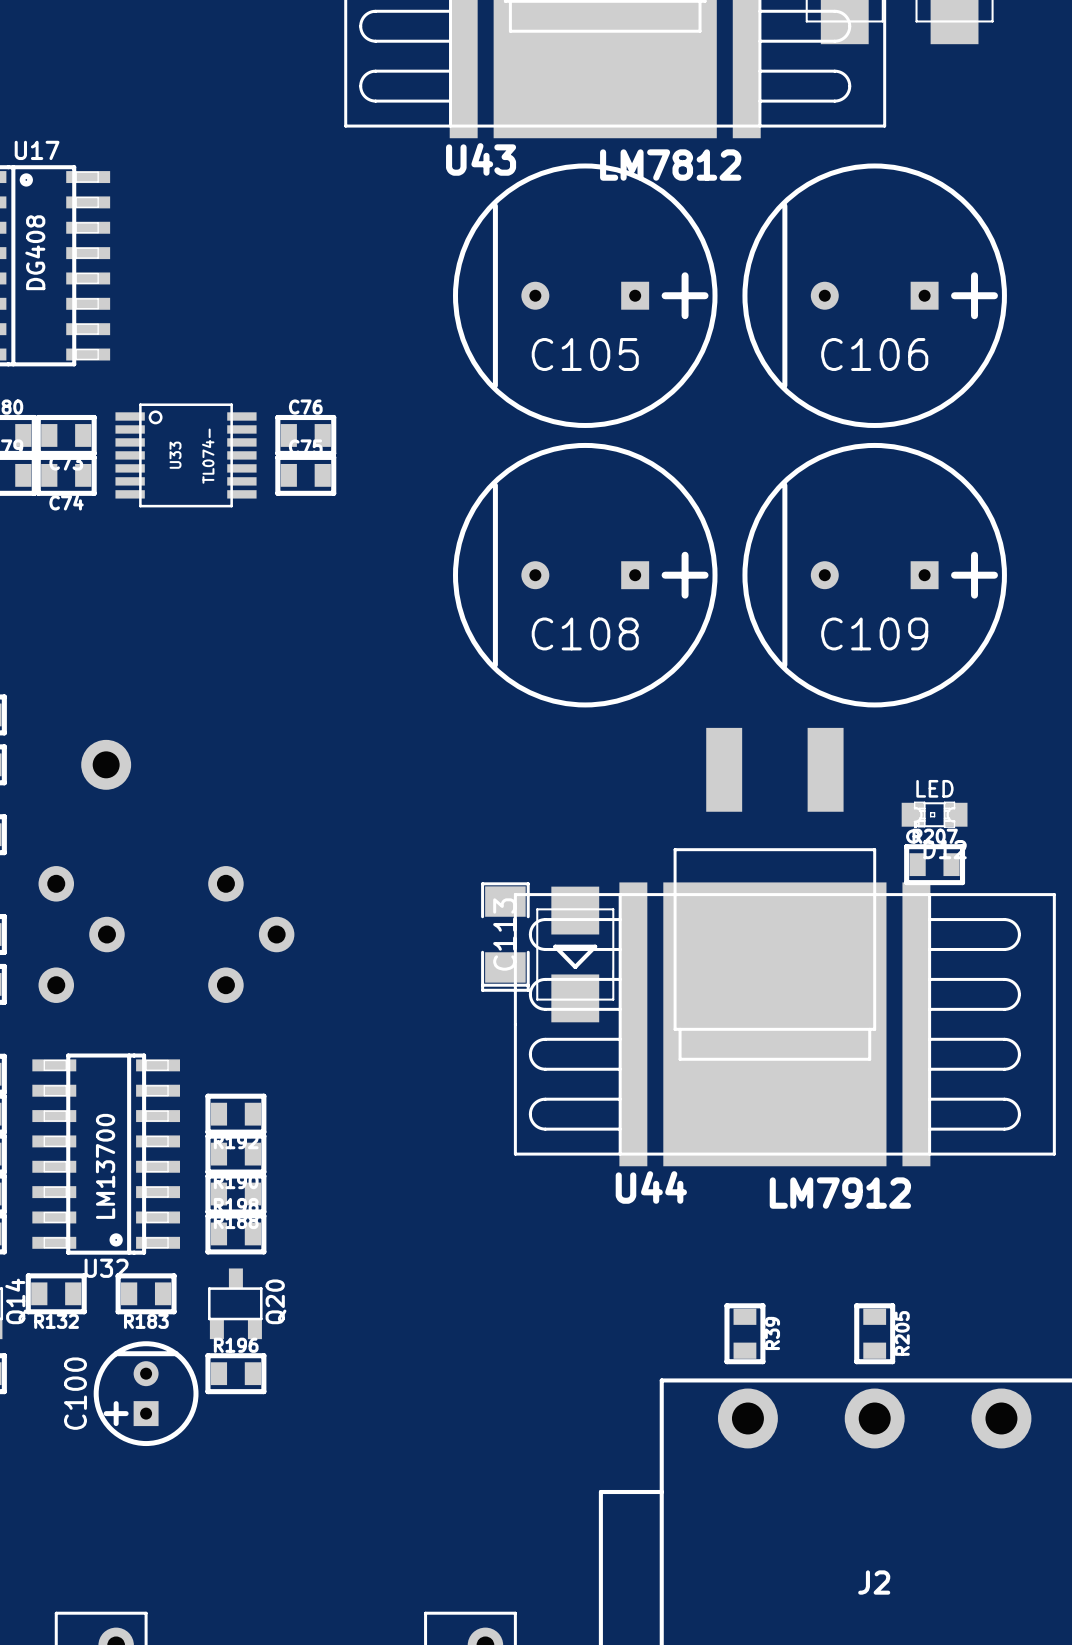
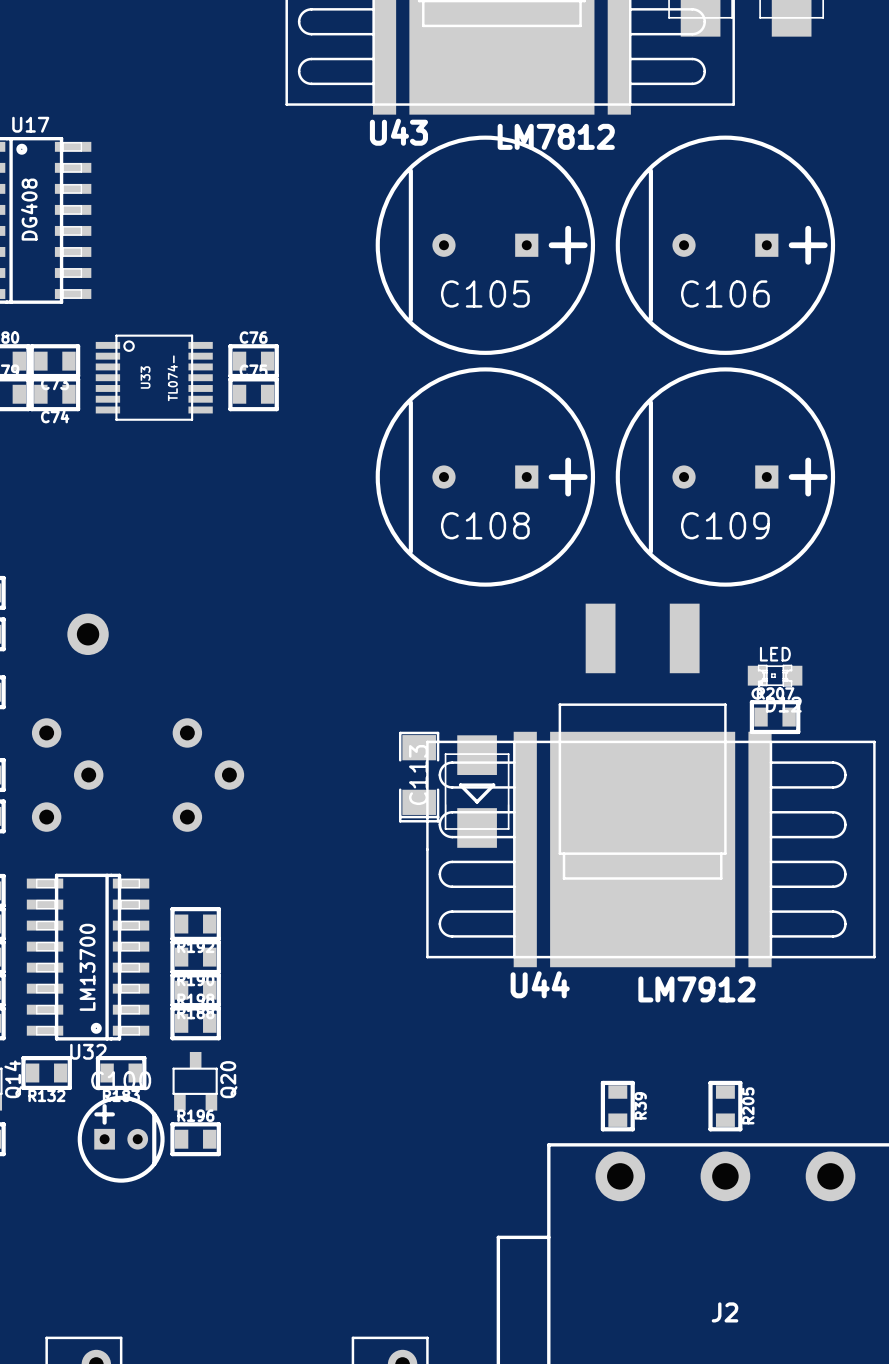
C100 rotation: 0° (146, 1393) -> 90° clockwise (121, 1139)

